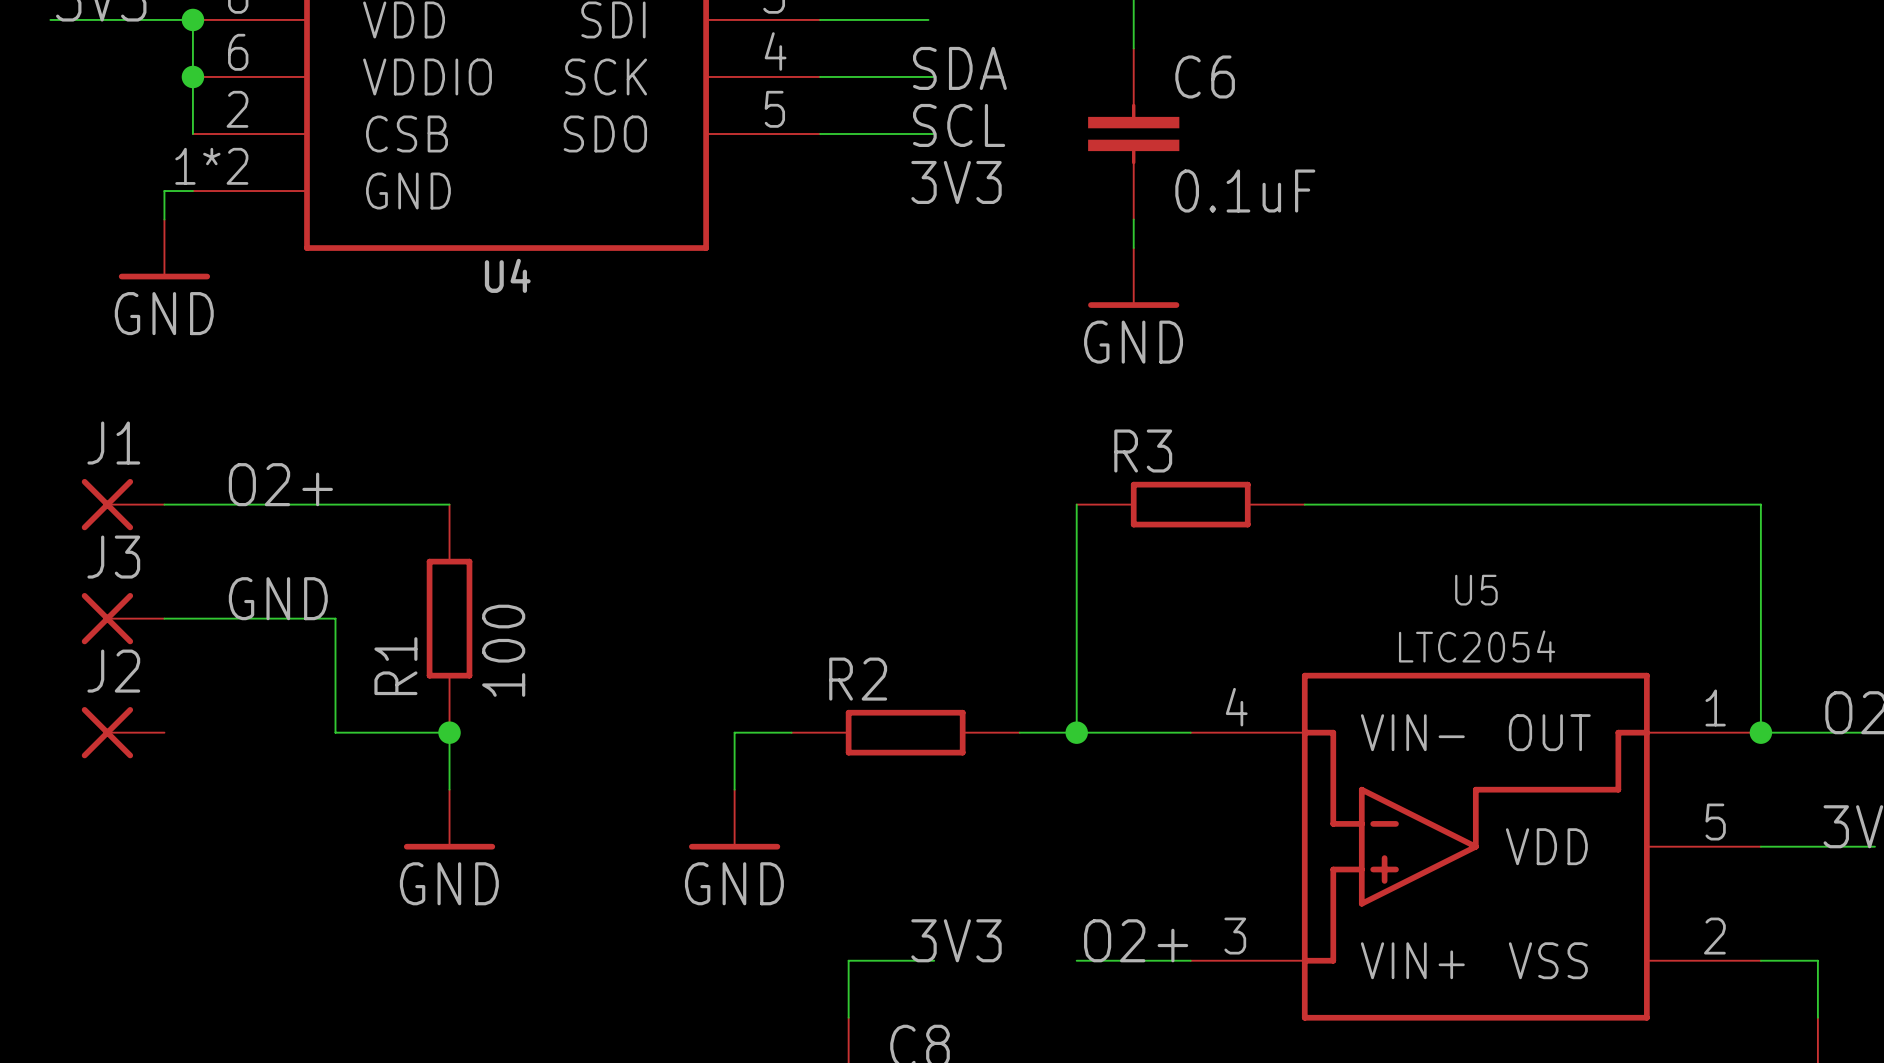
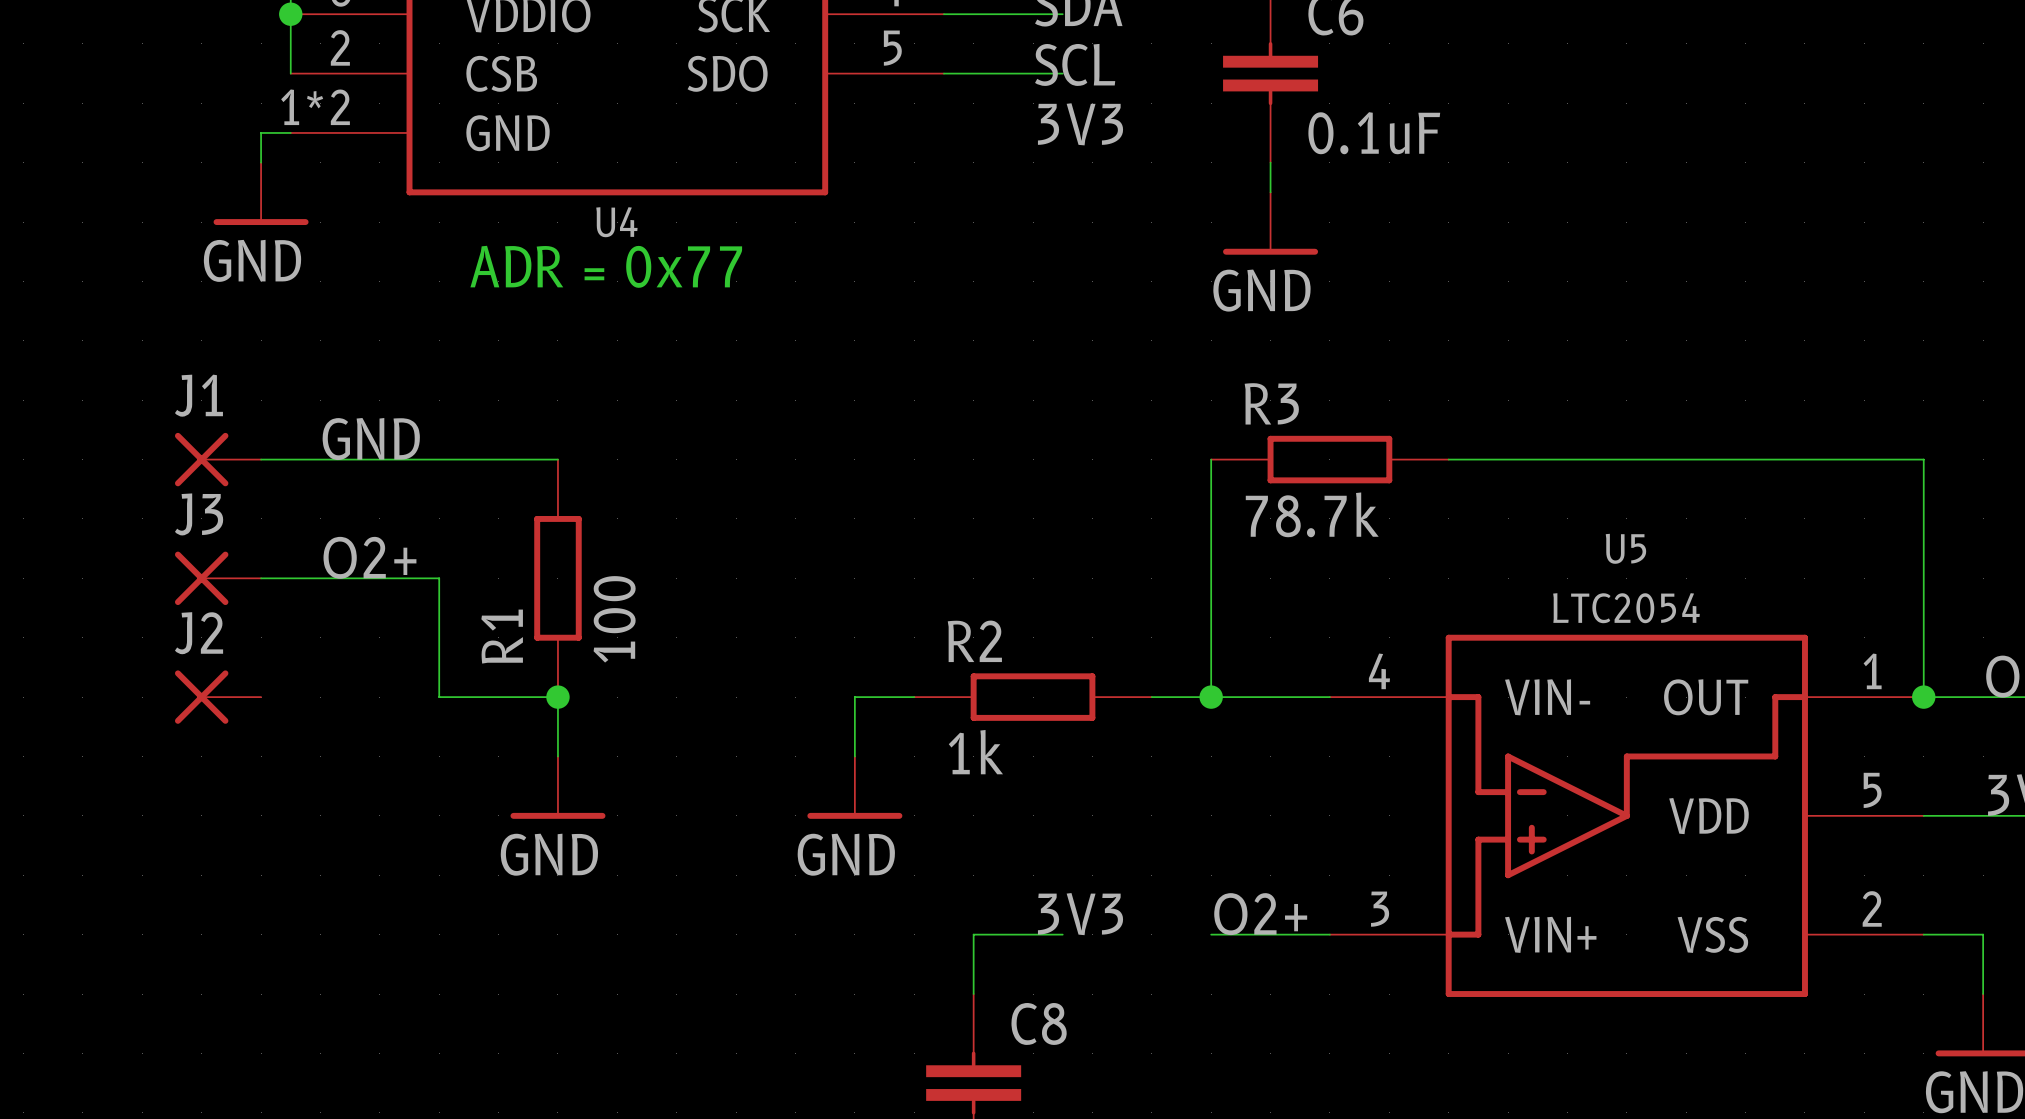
text: none -> ADR = 0x77 (606, 266)
label: O2+ (280, 484) -> GND (371, 439)
R3 value: none -> 78.7k (1312, 514)
label: GND (278, 598) -> O2+ (369, 557)
R2 value: none -> 1k (975, 752)

